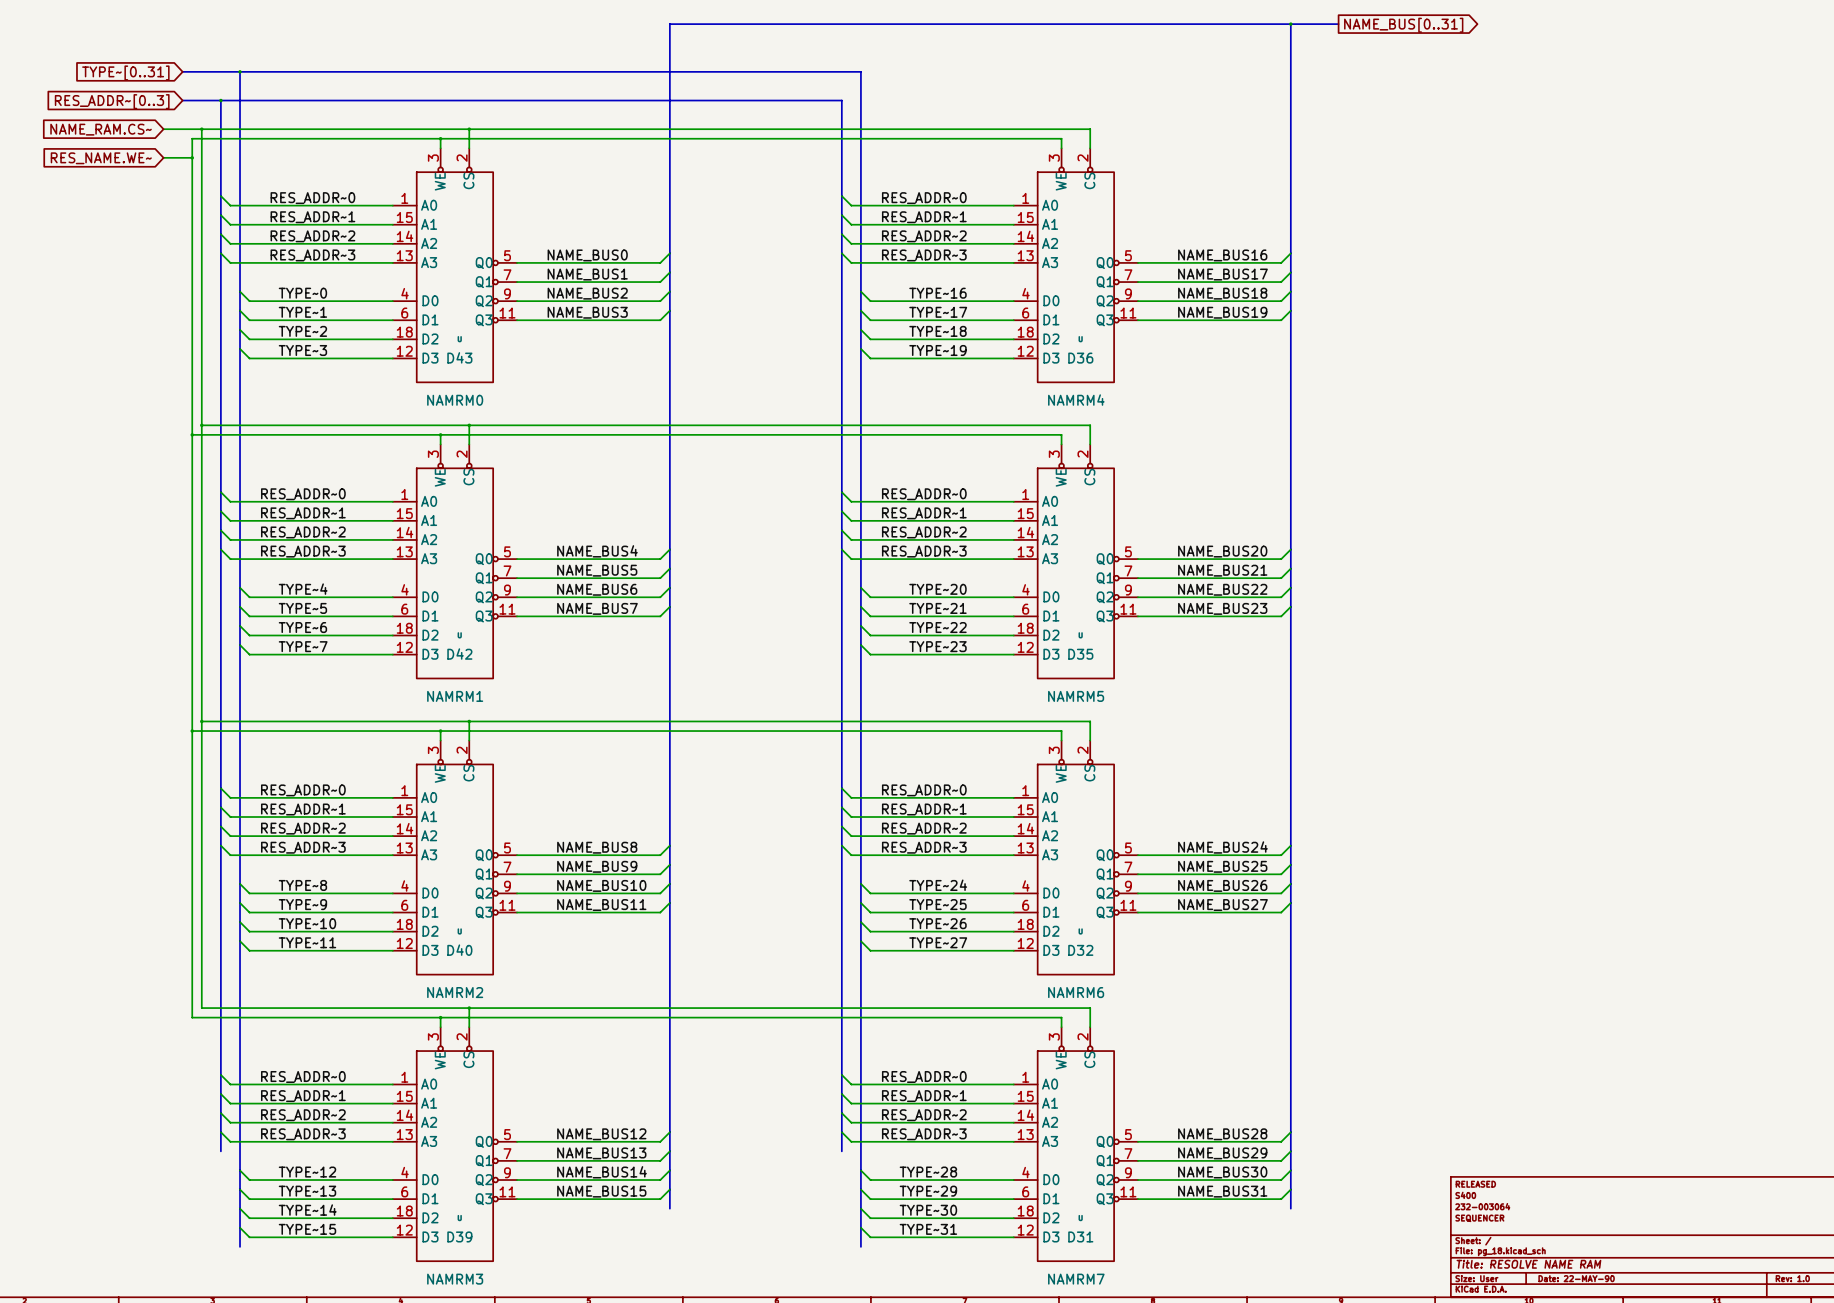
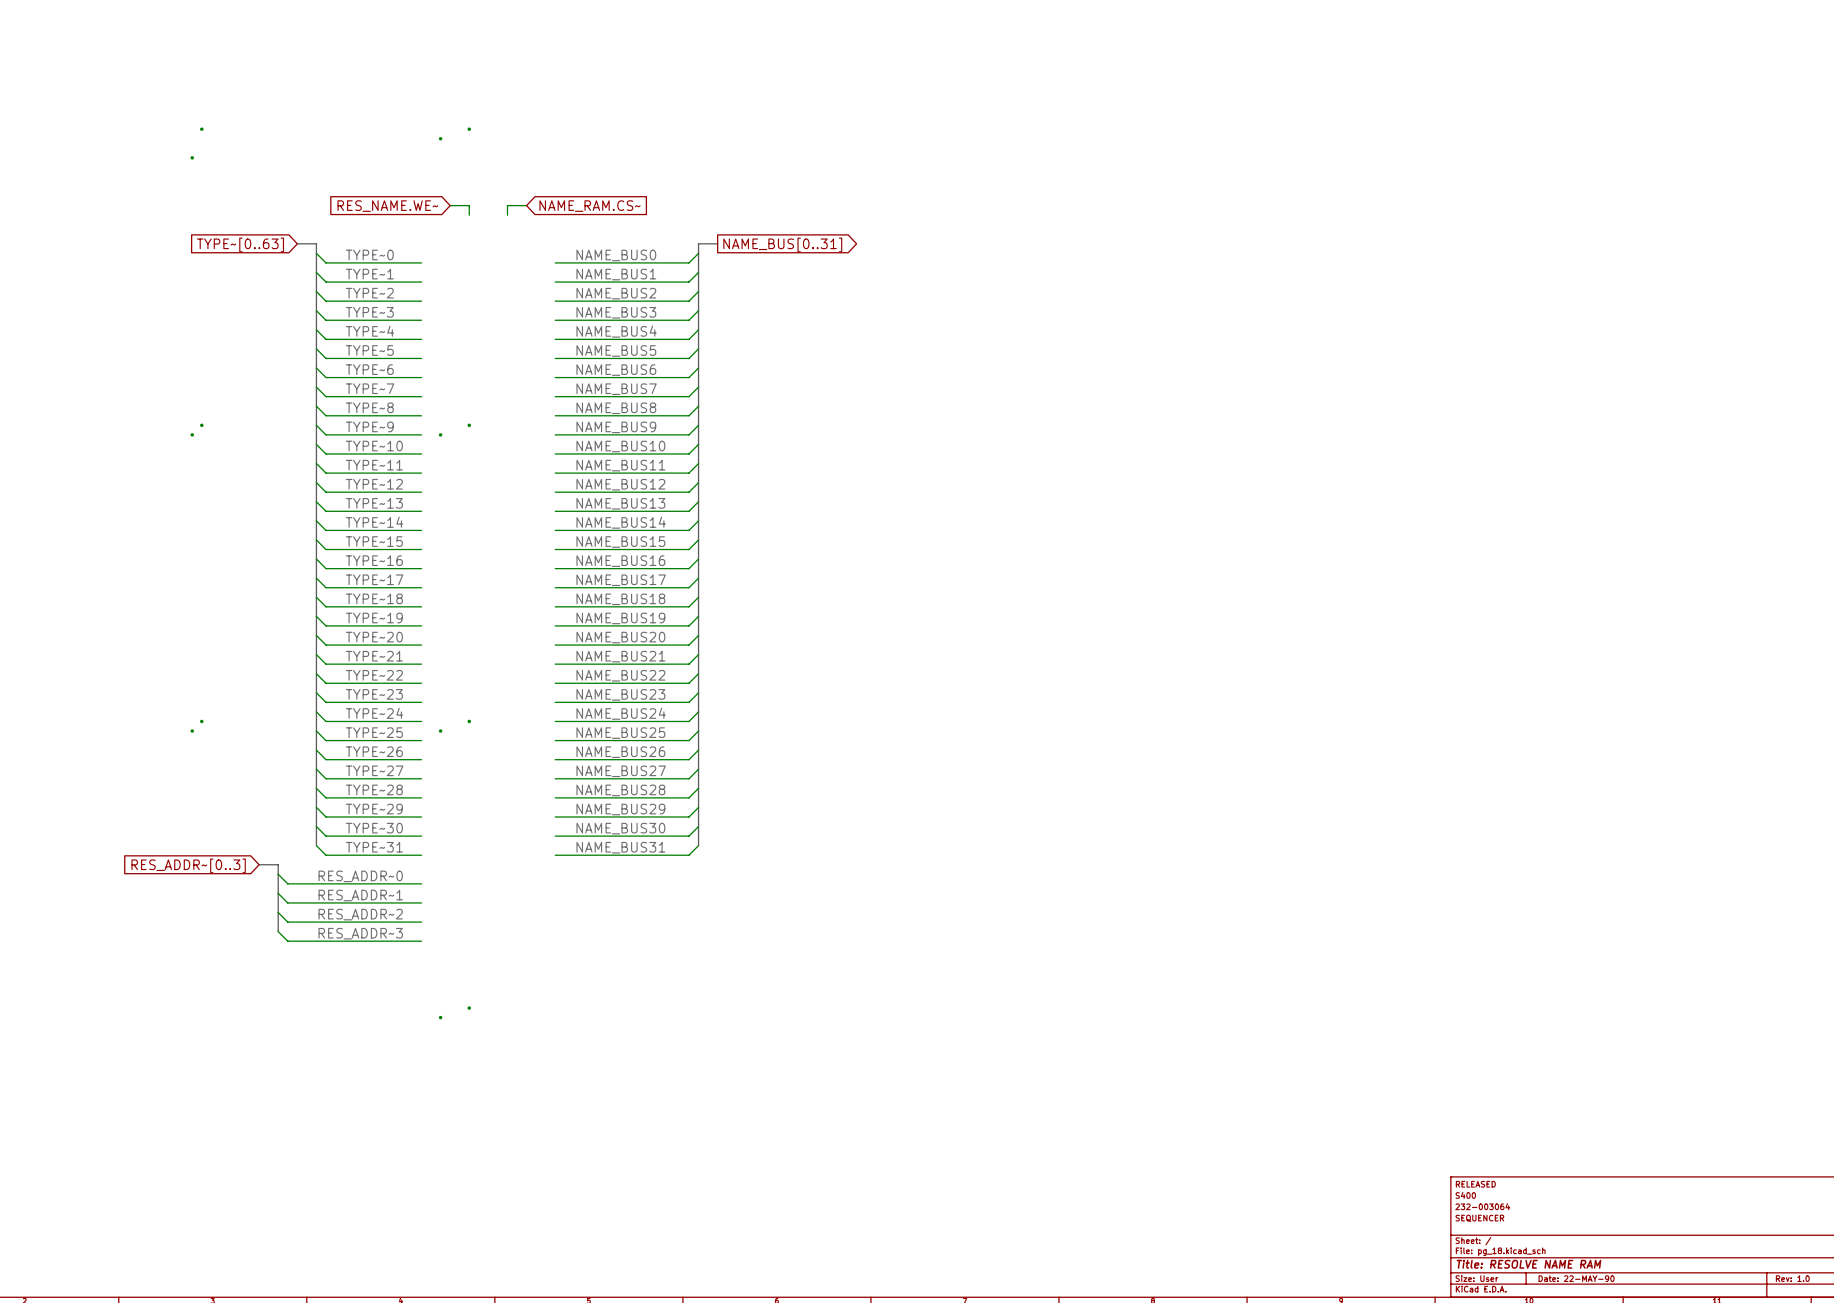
bus: (1290, 24) (1290, 1208) -> none
junction: (1290, 24) -> none
bus: (1338, 24) (669, 24) (669, 1208) -> none
global label: NAME_BUS[0..31] (1403, 25) -> none
bus: (182, 71) (860, 71) (860, 1246) -> none
bus: (240, 71) (240, 1246) -> none
junction: (240, 71) -> none
global label: TYPE~[0..31] (125, 73) -> none
bus: (182, 100) (841, 100) (841, 1151) -> none
bus: (220, 100) (220, 1151) -> none
junction: (220, 100) -> none
global label: RES_ADDR~[0..3] (112, 101) -> none
global label: NAME_RAM.CS~ (101, 129) -> none
wire: (163, 129) (1090, 129) (1090, 148) -> none
wire: (201, 129) (201, 1008) (1090, 1008) (1090, 1027) -> none
wire: (469, 129) (469, 148) -> none
wire: (440, 138) (440, 148) -> none
wire: (1061, 148) (1061, 138) (192, 138) (192, 1017) (1061, 1017) (1061, 1027) -> none
wire: (163, 157) (192, 157) -> none
global label: RES_NAME.WE~ (101, 158) -> none
wire: (220, 196) (230, 205) (392, 205) -> none
wire: (841, 196) (851, 205) (1013, 205) -> none
label: RES_ADDR~0 (312, 198) -> none
label: RES_ADDR~0 (924, 198) -> none
wire: none -> (450, 205) (469, 205) (469, 215)
wire: none -> (526, 205) (507, 205) (507, 215)
global label: none -> RES_NAME.WE~ (387, 206)
global label: none -> NAME_RAM.CS~ (590, 206)
wire: (220, 215) (230, 224) (392, 224) -> none
wire: (841, 215) (851, 224) (1013, 224) -> none
label: RES_ADDR~1 (312, 217) -> none
label: RES_ADDR~1 (924, 217) -> none
wire: (220, 234) (230, 243) (392, 243) -> none
wire: (841, 234) (851, 243) (1013, 243) -> none
label: RES_ADDR~2 (312, 236) -> none
label: RES_ADDR~2 (924, 236) -> none
bus: none -> (297, 243) (316, 243) (316, 845)
bus: none -> (717, 243) (698, 243) (698, 845)
global label: none -> TYPE~[0..63] (240, 244)
global label: none -> NAME_BUS[0..31] (782, 244)
wire: (220, 253) (230, 262) (325, 262) -> (316, 253) (325, 262)
wire: (669, 253) (660, 262) -> (698, 253) (688, 262) (660, 262)
wire: (841, 253) (851, 262) (1013, 262) -> none
wire: (1290, 253) (1281, 262) (1137, 262) -> none
label: RES_ADDR~3 (312, 255) -> none
label position: NAME_BUS0 (587, 255) -> NAME_BUS0 (616, 255)
label: RES_ADDR~3 (924, 255) -> none
label: NAME_BUS16 (1222, 255) -> none
wire: (517, 262) (555, 262) -> none
part: (454, 265) -> none
part: (1075, 265) -> none
wire: none -> (316, 272) (325, 282) (421, 282)
wire: (669, 272) (660, 282) -> (698, 272) (688, 282) (660, 282)
wire: (1290, 272) (1281, 282) (1137, 282) -> none
label position: NAME_BUS1 (587, 274) -> NAME_BUS1 (616, 274)
label: NAME_BUS17 (1222, 274) -> none
wire: (517, 282) (555, 282) -> none
wire: (240, 291) (249, 301) (325, 301) -> (316, 291) (325, 301)
wire: (669, 291) (660, 301) -> (698, 291) (688, 301) (660, 301)
wire: (860, 291) (870, 301) (1013, 301) -> none
wire: (1290, 291) (1281, 301) (1137, 301) -> none
label position: TYPE~0 (302, 293) -> TYPE~0 (369, 254)
label position: NAME_BUS2 (587, 293) -> NAME_BUS2 (616, 293)
label: TYPE~16 (937, 293) -> none
label: NAME_BUS18 (1222, 293) -> none
wire: (517, 301) (555, 301) -> none
wire: (240, 310) (249, 320) (325, 320) -> (316, 310) (325, 320)
wire: (669, 310) (660, 320) -> (698, 310) (688, 320) (660, 320)
wire: (860, 310) (870, 320) (1013, 320) -> none
wire: (1290, 310) (1281, 320) (1137, 320) -> none
label position: TYPE~1 (302, 312) -> TYPE~1 (369, 274)
label position: NAME_BUS3 (587, 312) -> NAME_BUS3 (616, 312)
label: TYPE~17 (938, 312) -> none
label: NAME_BUS19 (1222, 312) -> none
wire: (517, 320) (555, 320) -> none
wire: (240, 329) (249, 339) (325, 339) -> (316, 329) (325, 339)
wire: none -> (698, 329) (688, 339) (555, 339)
wire: (860, 329) (870, 339) (1013, 339) -> none
label position: TYPE~2 (302, 331) -> TYPE~2 (369, 293)
label: none -> TYPE~4 (370, 331)
label: none -> NAME_BUS4 (616, 331)
label: TYPE~18 (937, 331) -> none
wire: (240, 348) (249, 358) (325, 358) -> (316, 348) (325, 358)
wire: none -> (698, 348) (688, 358) (555, 358)
wire: (860, 348) (870, 358) (1013, 358) -> none
label position: TYPE~3 (302, 350) -> TYPE~3 (369, 312)
label: none -> TYPE~5 (369, 350)
label: none -> NAME_BUS5 (616, 350)
label: TYPE~19 (937, 350) -> none
wire: none -> (316, 368) (325, 377) (421, 377)
wire: none -> (698, 368) (688, 377) (555, 377)
label: none -> TYPE~6 (369, 369)
label: none -> NAME_BUS6 (616, 370)
wire: none -> (316, 387) (325, 396) (421, 396)
wire: none -> (698, 387) (688, 396) (555, 396)
label: none -> TYPE~7 (370, 388)
label: none -> NAME_BUS7 (616, 389)
wire: none -> (316, 406) (325, 415) (421, 415)
wire: none -> (698, 406) (688, 415) (555, 415)
label: none -> TYPE~8 (369, 407)
label: none -> NAME_BUS8 (616, 408)
wire: (201, 425) (1090, 425) (1090, 444) -> none
wire: (469, 425) (469, 444) -> none
label: none -> TYPE~9 (369, 426)
label: none -> NAME_BUS9 (616, 427)
wire: (192, 434) (325, 434) -> (316, 425) (325, 434)
wire: (421, 434) (555, 434) -> none
wire: (440, 434) (440, 444) -> none
wire: (688, 434) (1061, 434) (1061, 444) -> (688, 434) (698, 425)
wire: none -> (316, 444) (325, 453) (421, 453)
wire: none -> (698, 444) (688, 453) (555, 453)
label: none -> TYPE~10 (374, 446)
label: none -> NAME_BUS10 (620, 446)
wire: none -> (316, 463) (325, 473) (421, 473)
wire: none -> (698, 463) (688, 473) (555, 473)
label: none -> TYPE~11 (374, 465)
label: none -> NAME_BUS11 (620, 465)
wire: none -> (316, 482) (325, 492) (421, 492)
wire: none -> (698, 482) (688, 492) (555, 492)
label: none -> TYPE~12 (374, 484)
label: none -> NAME_BUS12 (620, 484)
wire: (220, 492) (230, 501) (392, 501) -> none
wire: (841, 492) (851, 501) (1013, 501) -> none
label: RES_ADDR~0 (303, 494) -> none
label: RES_ADDR~0 (924, 494) -> none
wire: none -> (316, 501) (325, 511) (421, 511)
wire: none -> (698, 501) (688, 511) (555, 511)
label: none -> TYPE~13 (374, 503)
label: none -> NAME_BUS13 (620, 503)
wire: (220, 511) (230, 520) (392, 520) -> none
wire: (841, 511) (851, 520) (1013, 520) -> none
label: RES_ADDR~1 (303, 513) -> none
label: RES_ADDR~1 (924, 513) -> none
wire: none -> (316, 520) (325, 530) (421, 530)
wire: none -> (698, 520) (688, 530) (555, 530)
label: none -> TYPE~14 (374, 522)
label: none -> NAME_BUS14 (621, 522)
wire: (220, 530) (230, 539) (392, 539) -> none
wire: (841, 530) (851, 539) (1013, 539) -> none
label: RES_ADDR~2 (303, 532) -> none
label: RES_ADDR~2 (924, 532) -> none
wire: none -> (316, 539) (325, 549) (421, 549)
wire: none -> (698, 539) (688, 549) (555, 549)
label: none -> TYPE~15 (374, 541)
label: none -> NAME_BUS15 (620, 542)
wire: (220, 549) (230, 559) (392, 559) -> none
wire: (669, 549) (660, 559) (517, 559) -> none
wire: (841, 549) (851, 559) (1013, 559) -> none
wire: (1290, 549) (1281, 559) (1137, 559) -> none
label: RES_ADDR~3 (303, 551) -> none
label: NAME_BUS4 (597, 551) -> none
label: RES_ADDR~3 (924, 551) -> none
label: NAME_BUS20 (1222, 551) -> none
wire: none -> (316, 559) (325, 568) (421, 568)
wire: none -> (698, 559) (688, 568) (555, 568)
label: none -> TYPE~16 (374, 560)
part: (454, 561) -> none
label: none -> NAME_BUS16 (620, 561)
part: (1075, 561) -> none
wire: (669, 568) (660, 578) (517, 578) -> none
wire: (1290, 568) (1281, 578) (1137, 578) -> none
label: NAME_BUS5 (597, 570) -> none
label: NAME_BUS21 (1222, 570) -> none
wire: none -> (316, 578) (325, 587) (421, 587)
wire: none -> (698, 578) (688, 587) (555, 587)
label: none -> TYPE~17 (374, 579)
label: none -> NAME_BUS17 (621, 580)
wire: (240, 587) (249, 597) (392, 597) -> none
wire: (669, 587) (660, 597) (517, 597) -> none
wire: (860, 587) (870, 597) (1013, 597) -> none
wire: (1290, 587) (1281, 597) (1137, 597) -> none
label: TYPE~4 (303, 589) -> none
label: NAME_BUS6 (597, 589) -> none
label: TYPE~20 (937, 589) -> none
label: NAME_BUS22 (1222, 589) -> none
wire: none -> (316, 597) (325, 606) (421, 606)
wire: none -> (698, 597) (688, 606) (555, 606)
label: none -> TYPE~18 (374, 598)
label: none -> NAME_BUS18 (620, 599)
wire: (240, 606) (249, 616) (392, 616) -> none
wire: (669, 606) (660, 616) (517, 616) -> none
wire: (860, 606) (870, 616) (1013, 616) -> none
wire: (1290, 606) (1281, 616) (1137, 616) -> none
label: TYPE~5 (302, 608) -> none
label: NAME_BUS7 (597, 608) -> none
label: TYPE~21 (937, 608) -> none
label: NAME_BUS23 (1222, 608) -> none
wire: none -> (316, 616) (325, 625) (421, 625)
wire: none -> (698, 616) (688, 625) (555, 625)
label: none -> TYPE~19 (374, 617)
label: none -> NAME_BUS19 (620, 618)
wire: (240, 625) (249, 635) (392, 635) -> none
wire: (860, 625) (870, 635) (1013, 635) -> none
label: TYPE~6 (302, 627) -> none
label: TYPE~22 (937, 627) -> none
wire: none -> (316, 635) (325, 645) (421, 645)
wire: none -> (698, 635) (688, 645) (555, 645)
label: none -> TYPE~20 (374, 637)
label: none -> NAME_BUS20 (620, 637)
wire: (240, 645) (249, 654) (392, 654) -> none
wire: (860, 645) (870, 654) (1013, 654) -> none
label: TYPE~7 (303, 646) -> none
label: TYPE~23 (937, 646) -> none
wire: none -> (316, 654) (325, 664) (421, 664)
wire: none -> (698, 654) (688, 664) (555, 664)
label: none -> TYPE~21 (374, 656)
label: none -> NAME_BUS21 (620, 656)
wire: none -> (316, 673) (325, 683) (421, 683)
wire: none -> (698, 673) (688, 683) (555, 683)
label: none -> TYPE~22 (374, 675)
label: none -> NAME_BUS22 (620, 675)
wire: none -> (316, 692) (325, 702) (421, 702)
wire: none -> (698, 692) (688, 702) (555, 702)
label: none -> TYPE~23 (374, 694)
label: none -> NAME_BUS23 (620, 694)
label: none -> TYPE~24 (374, 713)
label: none -> NAME_BUS24 (621, 713)
wire: (201, 721) (325, 721) -> (316, 711) (325, 721)
wire: (421, 721) (555, 721) -> none
wire: (469, 721) (469, 740) -> none
wire: (688, 721) (1090, 721) (1090, 740) -> (688, 721) (698, 711)
wire: (192, 731) (1061, 731) (1061, 740) -> none
wire: none -> (316, 731) (325, 740) (421, 740)
wire: (440, 731) (440, 740) -> none
wire: none -> (698, 731) (688, 740) (555, 740)
label: none -> TYPE~25 (374, 732)
label: none -> NAME_BUS25 (620, 733)
wire: none -> (316, 750) (325, 759) (421, 759)
wire: none -> (698, 750) (688, 759) (555, 759)
label: none -> TYPE~26 (374, 751)
label: none -> NAME_BUS26 (620, 752)
wire: none -> (316, 769) (325, 778) (421, 778)
wire: none -> (698, 769) (688, 778) (555, 778)
label: none -> TYPE~27 (374, 770)
label: none -> NAME_BUS27 (621, 771)
wire: (220, 788) (230, 797) (325, 797) -> (316, 788) (325, 797)
wire: none -> (698, 788) (688, 797) (555, 797)
wire: (841, 788) (851, 797) (1013, 797) -> none
label: none -> TYPE~28 (374, 789)
label: RES_ADDR~0 (303, 790) -> none
label: none -> NAME_BUS28 (620, 790)
label: RES_ADDR~0 (924, 790) -> none
wire: (220, 807) (230, 816) (325, 816) -> (316, 807) (325, 816)
wire: none -> (698, 807) (688, 816) (555, 816)
wire: (841, 807) (851, 816) (1013, 816) -> none
label: RES_ADDR~1 (303, 809) -> none
label: none -> TYPE~29 (374, 809)
label: none -> NAME_BUS29 (620, 809)
label: RES_ADDR~1 (924, 809) -> none
wire: (220, 826) (230, 836) (325, 836) -> (316, 826) (325, 836)
wire: none -> (698, 826) (688, 836) (555, 836)
wire: (841, 826) (851, 836) (1013, 836) -> none
label: RES_ADDR~2 (303, 828) -> none
label: none -> TYPE~30 (374, 828)
label: none -> NAME_BUS30 (620, 828)
label: RES_ADDR~2 (924, 828) -> none
wire: (220, 845) (230, 855) (325, 855) -> (316, 845) (325, 855)
wire: (669, 845) (660, 855) -> (698, 845) (688, 855) (660, 855)
wire: (841, 845) (851, 855) (1013, 855) -> none
wire: (1290, 845) (1281, 855) (1137, 855) -> none
label: RES_ADDR~3 (303, 847) -> none
label: none -> TYPE~31 (374, 847)
label: NAME_BUS8 (597, 847) -> none
label: none -> NAME_BUS31 (620, 847)
label: RES_ADDR~3 (924, 847) -> none
label: NAME_BUS24 (1222, 847) -> none
wire: (517, 855) (555, 855) -> none
part: (454, 857) -> none
part: (1075, 857) -> none
bus: none -> (259, 864) (278, 864) (278, 931)
wire: (669, 864) (660, 874) (517, 874) -> none
wire: (1290, 864) (1281, 874) (1137, 874) -> none
global label: none -> RES_ADDR~[0..3] (188, 865)
label: NAME_BUS9 (597, 866) -> none
label: NAME_BUS25 (1222, 866) -> none
wire: none -> (278, 874) (287, 883) (421, 883)
label: none -> RES_ADDR~0 (360, 876)
wire: (240, 883) (249, 893) (392, 893) -> none
wire: (669, 883) (660, 893) (517, 893) -> none
wire: (860, 883) (870, 893) (1013, 893) -> none
wire: (1290, 883) (1281, 893) (1137, 893) -> none
label: TYPE~8 (302, 885) -> none
label: NAME_BUS10 (601, 885) -> none
label: TYPE~24 (938, 885) -> none
label: NAME_BUS26 (1222, 885) -> none
wire: none -> (278, 893) (287, 902) (421, 902)
label: none -> RES_ADDR~1 (360, 895)
wire: (240, 902) (249, 912) (392, 912) -> none
wire: (669, 902) (660, 912) (517, 912) -> none
wire: (860, 902) (870, 912) (1013, 912) -> none
wire: (1290, 902) (1281, 912) (1137, 912) -> none
label: TYPE~9 (302, 904) -> none
label: TYPE~25 (937, 904) -> none
label: NAME_BUS11 (601, 905) -> none
label: NAME_BUS27 (1222, 905) -> none
wire: none -> (278, 912) (287, 922) (421, 922)
label: none -> RES_ADDR~2 (360, 914)
wire: (240, 922) (249, 931) (392, 931) -> none
wire: (860, 922) (870, 931) (1013, 931) -> none
label: TYPE~10 (307, 923) -> none
label: TYPE~26 (937, 923) -> none
wire: none -> (278, 931) (287, 941) (421, 941)
label: none -> RES_ADDR~3 (360, 933)
wire: (240, 941) (249, 950) (392, 950) -> none
wire: (860, 941) (870, 950) (1013, 950) -> none
label: TYPE~11 (307, 942) -> none
label: TYPE~27 (938, 942) -> none
wire: (469, 1008) (469, 1027) -> none
wire: (440, 1017) (440, 1027) -> none
wire: (220, 1074) (230, 1084) (392, 1084) -> none
wire: (841, 1074) (851, 1084) (1013, 1084) -> none
label: RES_ADDR~0 (303, 1076) -> none
label: RES_ADDR~0 (924, 1076) -> none
wire: (220, 1094) (230, 1103) (392, 1103) -> none
wire: (841, 1094) (851, 1103) (1013, 1103) -> none
label: RES_ADDR~1 (303, 1096) -> none
label: RES_ADDR~1 (924, 1096) -> none
wire: (220, 1113) (230, 1122) (392, 1122) -> none
wire: (841, 1113) (851, 1122) (1013, 1122) -> none
label: RES_ADDR~2 (303, 1115) -> none
label: RES_ADDR~2 (924, 1115) -> none
wire: (220, 1132) (230, 1141) (392, 1141) -> none
wire: (669, 1132) (660, 1141) (517, 1141) -> none
wire: (841, 1132) (851, 1141) (1013, 1141) -> none
wire: (1290, 1132) (1281, 1141) (1137, 1141) -> none
label: RES_ADDR~3 (303, 1134) -> none
label: NAME_BUS12 (601, 1134) -> none
label: RES_ADDR~3 (924, 1134) -> none
label: NAME_BUS28 (1222, 1134) -> none
part: (454, 1144) -> none
part: (1075, 1144) -> none
wire: (669, 1151) (660, 1160) (517, 1160) -> none
wire: (1290, 1151) (1281, 1160) (1137, 1160) -> none
label: NAME_BUS13 (601, 1153) -> none
label: NAME_BUS29 (1222, 1153) -> none
wire: (240, 1170) (249, 1180) (392, 1180) -> none
wire: (669, 1170) (660, 1180) (517, 1180) -> none
wire: (860, 1170) (870, 1180) (1013, 1180) -> none
wire: (1290, 1170) (1281, 1180) (1137, 1180) -> none
label: TYPE~12 (307, 1172) -> none
label: NAME_BUS14 (602, 1172) -> none
label: TYPE~28 (928, 1172) -> none
label: NAME_BUS30 (1222, 1172) -> none
wire: (240, 1189) (249, 1199) (392, 1199) -> none
wire: (669, 1189) (660, 1199) (517, 1199) -> none
wire: (860, 1189) (870, 1199) (1013, 1199) -> none
wire: (1290, 1189) (1281, 1199) (1137, 1199) -> none
label: TYPE~13 (307, 1191) -> none
label: NAME_BUS15 (601, 1191) -> none
label: TYPE~29 (928, 1191) -> none
label: NAME_BUS31 (1222, 1191) -> none
wire: (240, 1208) (249, 1218) (392, 1218) -> none
wire: (860, 1208) (870, 1218) (1013, 1218) -> none
label: TYPE~14 (307, 1210) -> none
label: TYPE~30 (928, 1210) -> none
wire: (240, 1227) (249, 1237) (392, 1237) -> none
wire: (860, 1227) (870, 1237) (1013, 1237) -> none
label: TYPE~15 (307, 1229) -> none
label: TYPE~31 (928, 1229) -> none

